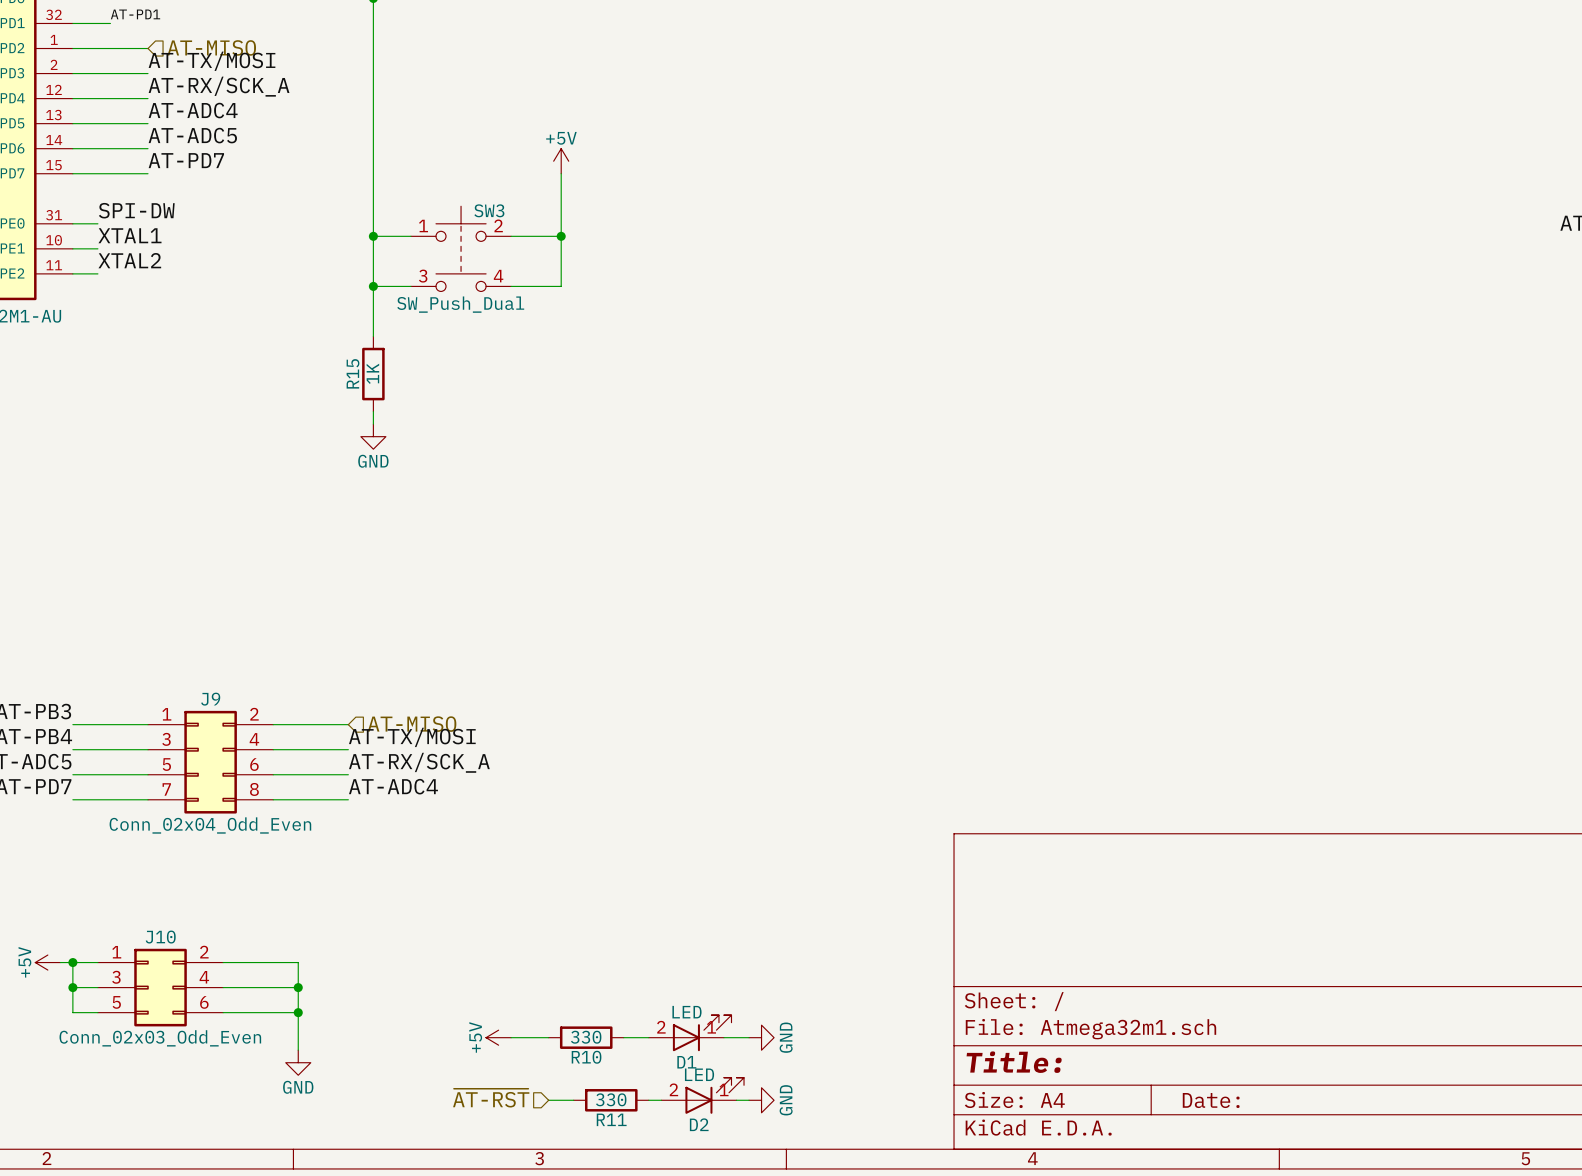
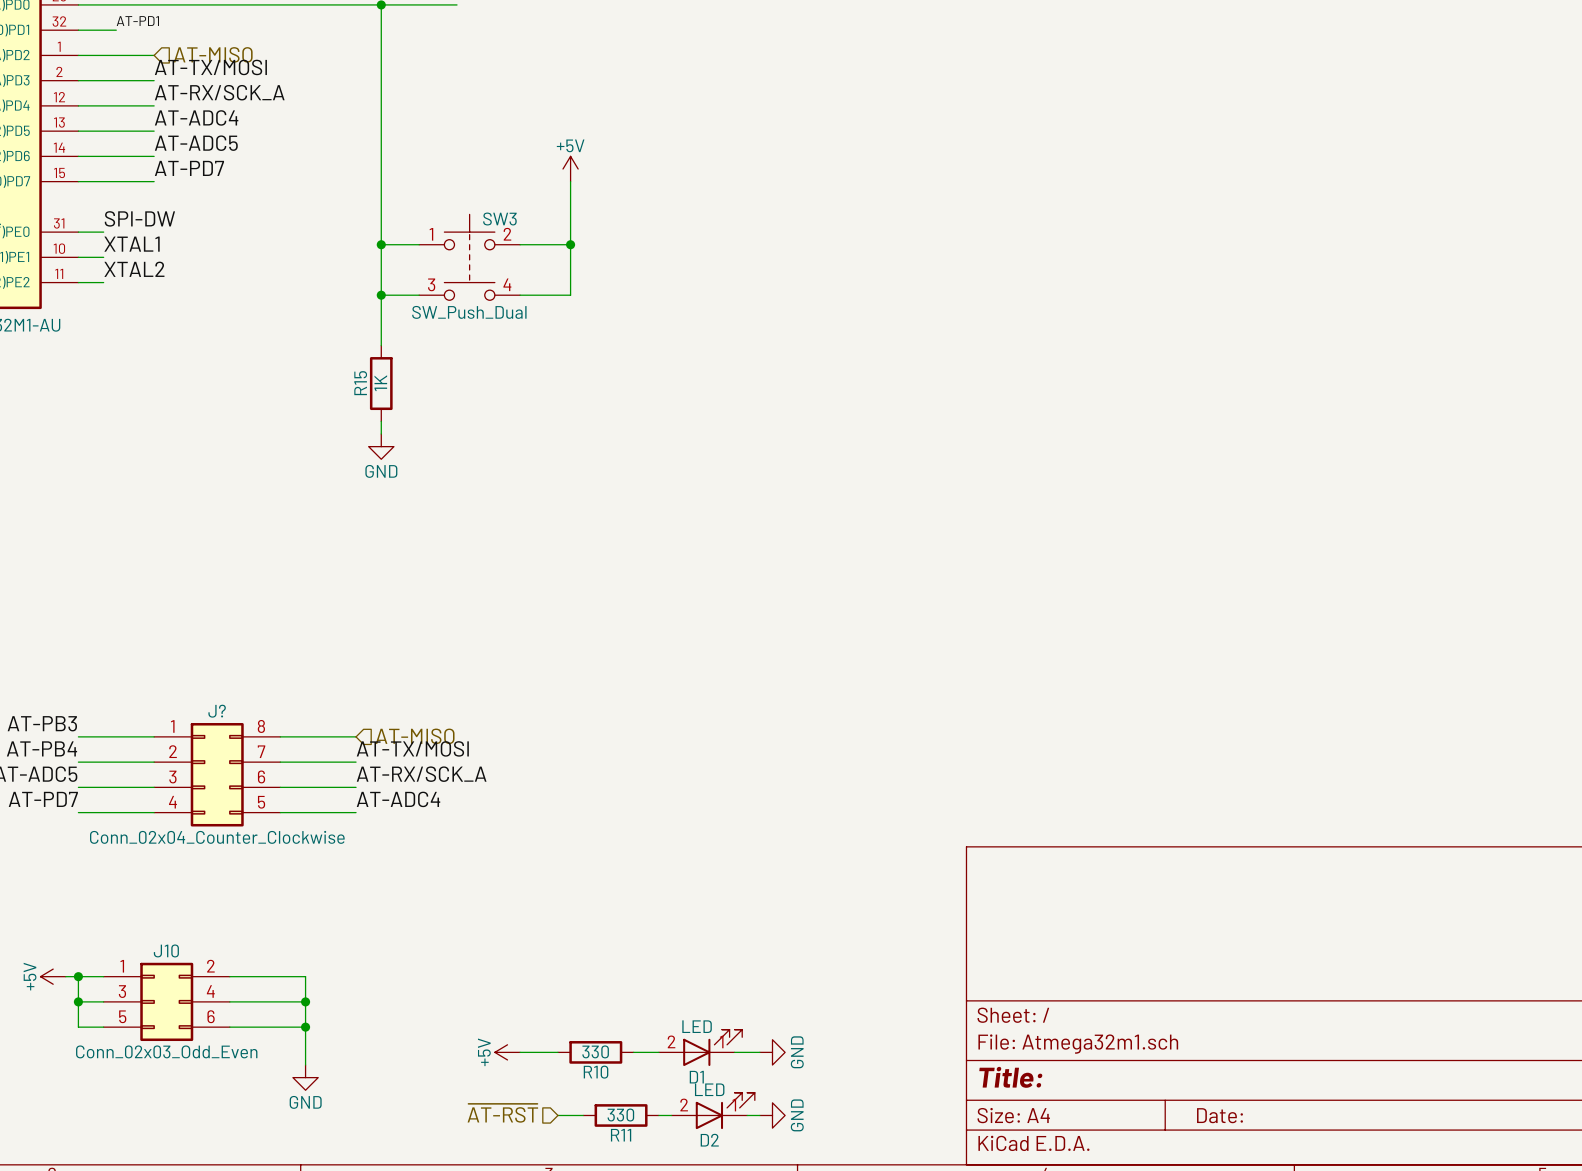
J9 name: J9 (210, 699) -> J? (217, 711)
J9 pin number: 2 (254, 714) -> 8 (261, 726)
J9 pin number: 3 (166, 739) -> 2 (173, 751)
J9 pin number: 4 (254, 739) -> 7 (261, 751)
J9 pin number: 5 (166, 764) -> 3 (172, 777)
J9 pin number: 7 (166, 789) -> 4 (172, 802)
J9 pin number: 8 (254, 789) -> 5 (261, 802)
J9 value: Conn_02x04_Odd_Even (210, 825) -> Conn_02x04_Counter_Clockwise (217, 837)

